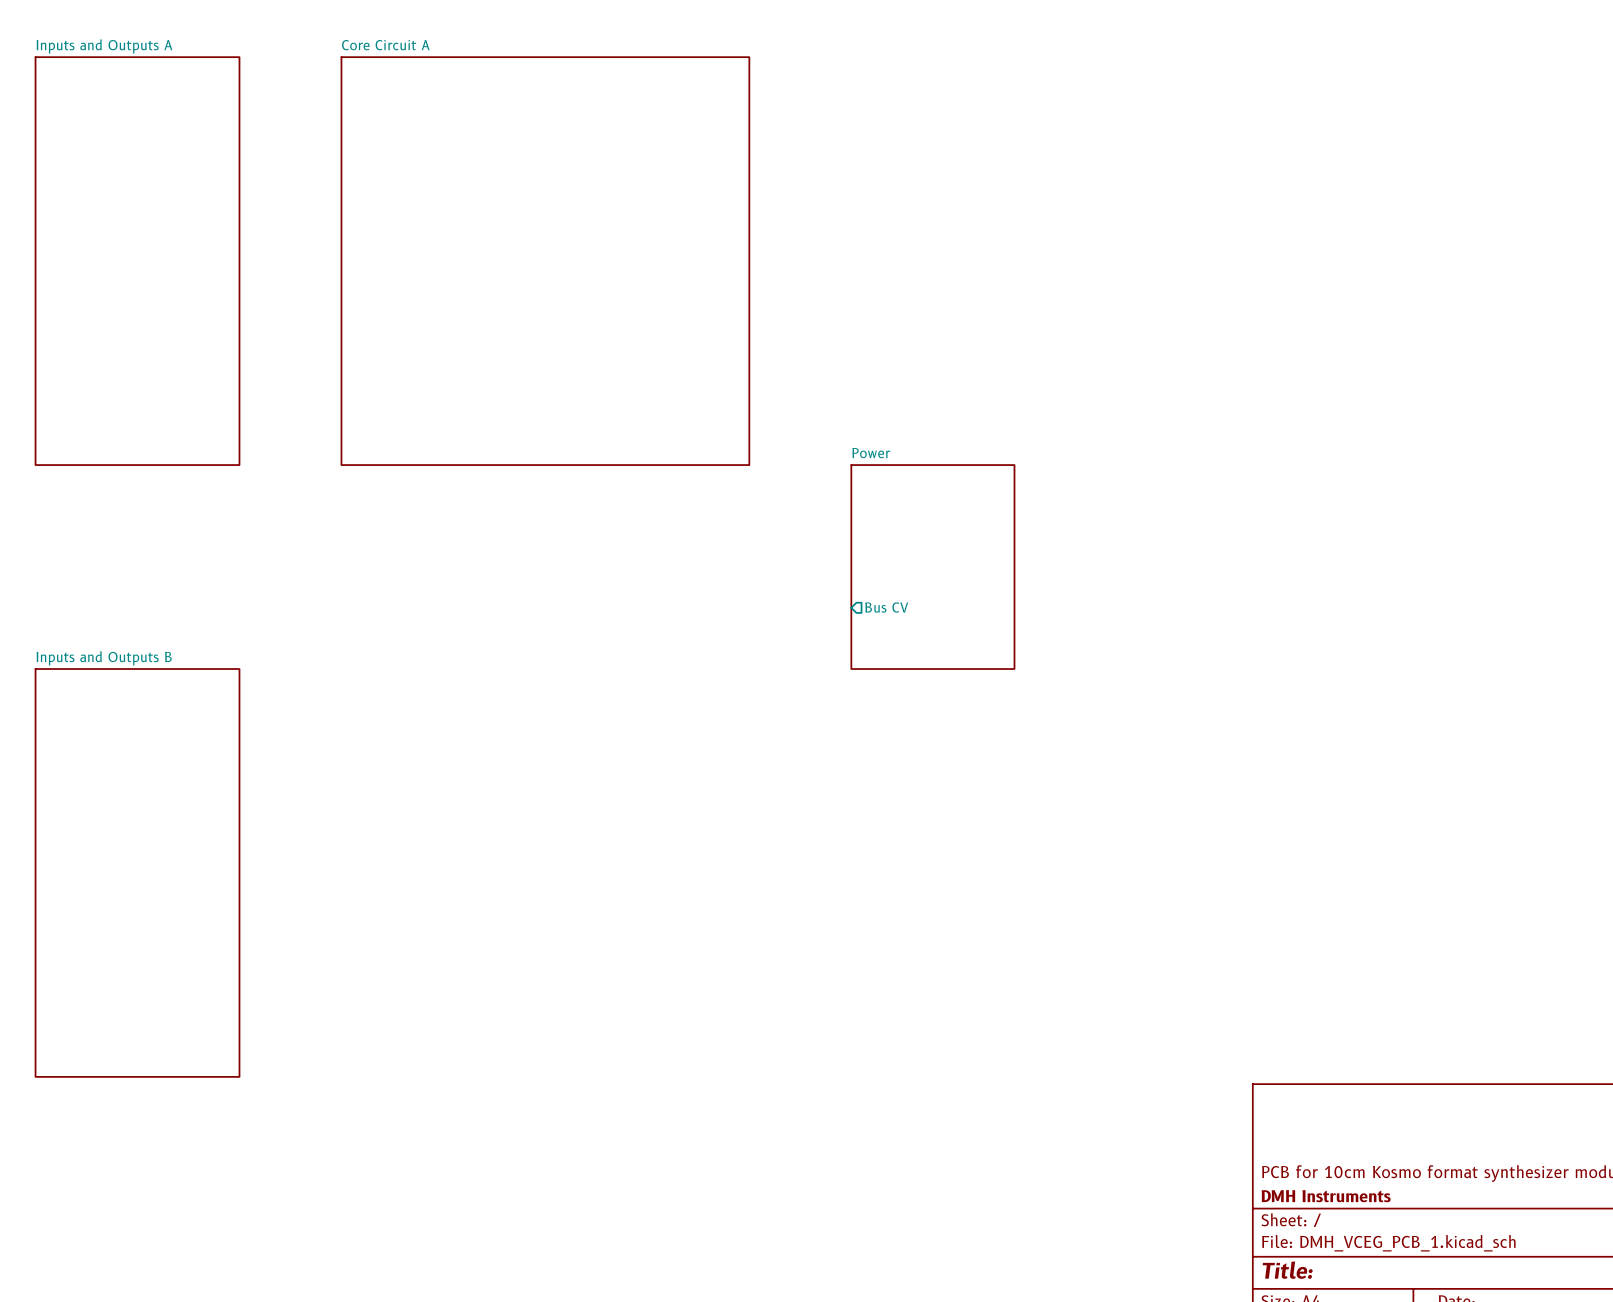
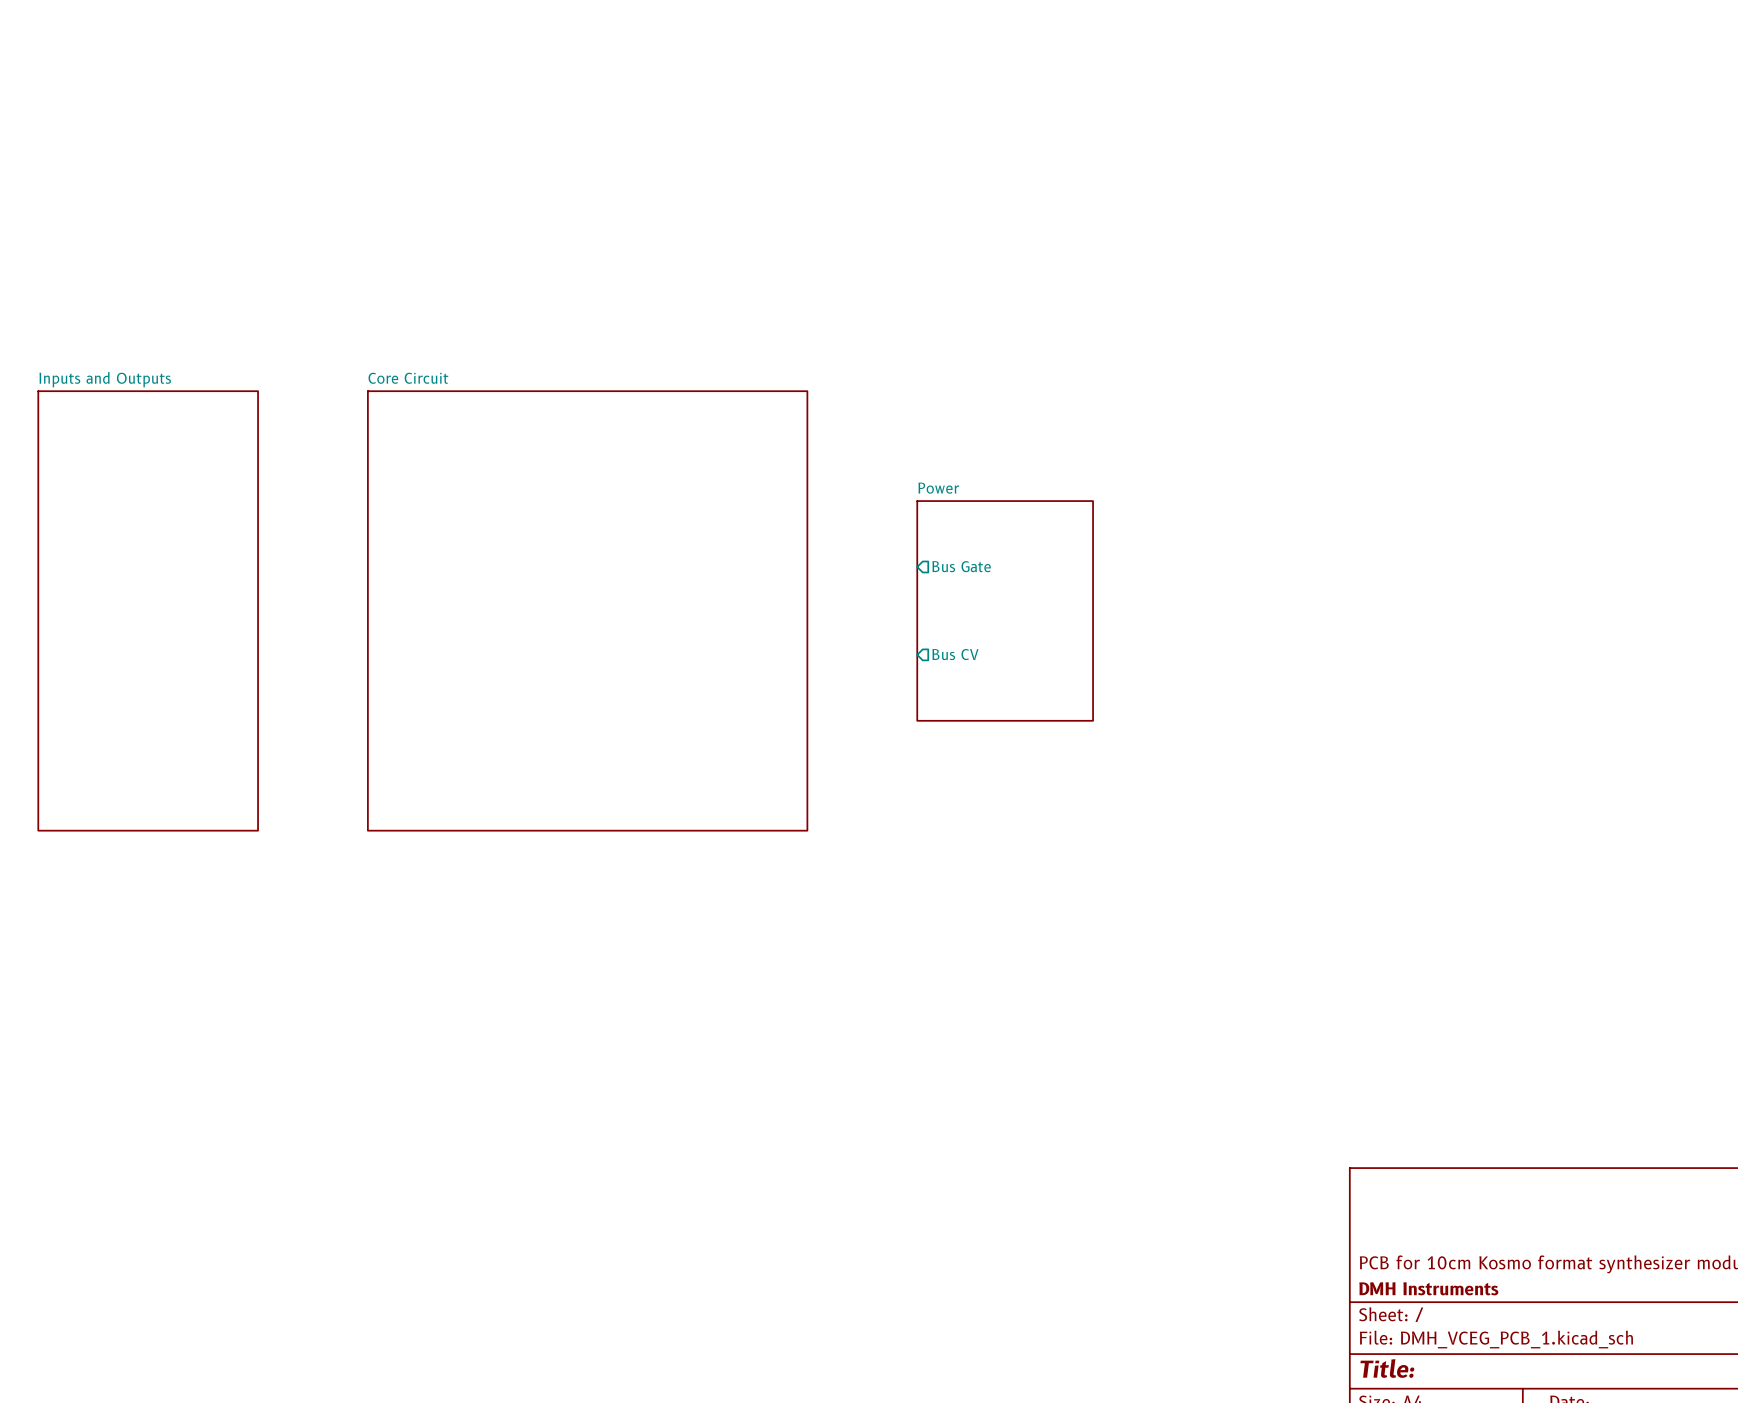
sheet Inputs and Outputs A: (137, 261) -> none
sheet Core Circuit A: (545, 261) -> none
sheet pin: none -> Bus Gate (961, 566)
sheet Inputs and Outputs: none -> (148, 610)
sheet Core Circuit: none -> (587, 610)
sheet Inputs and Outputs B: (137, 872) -> none

